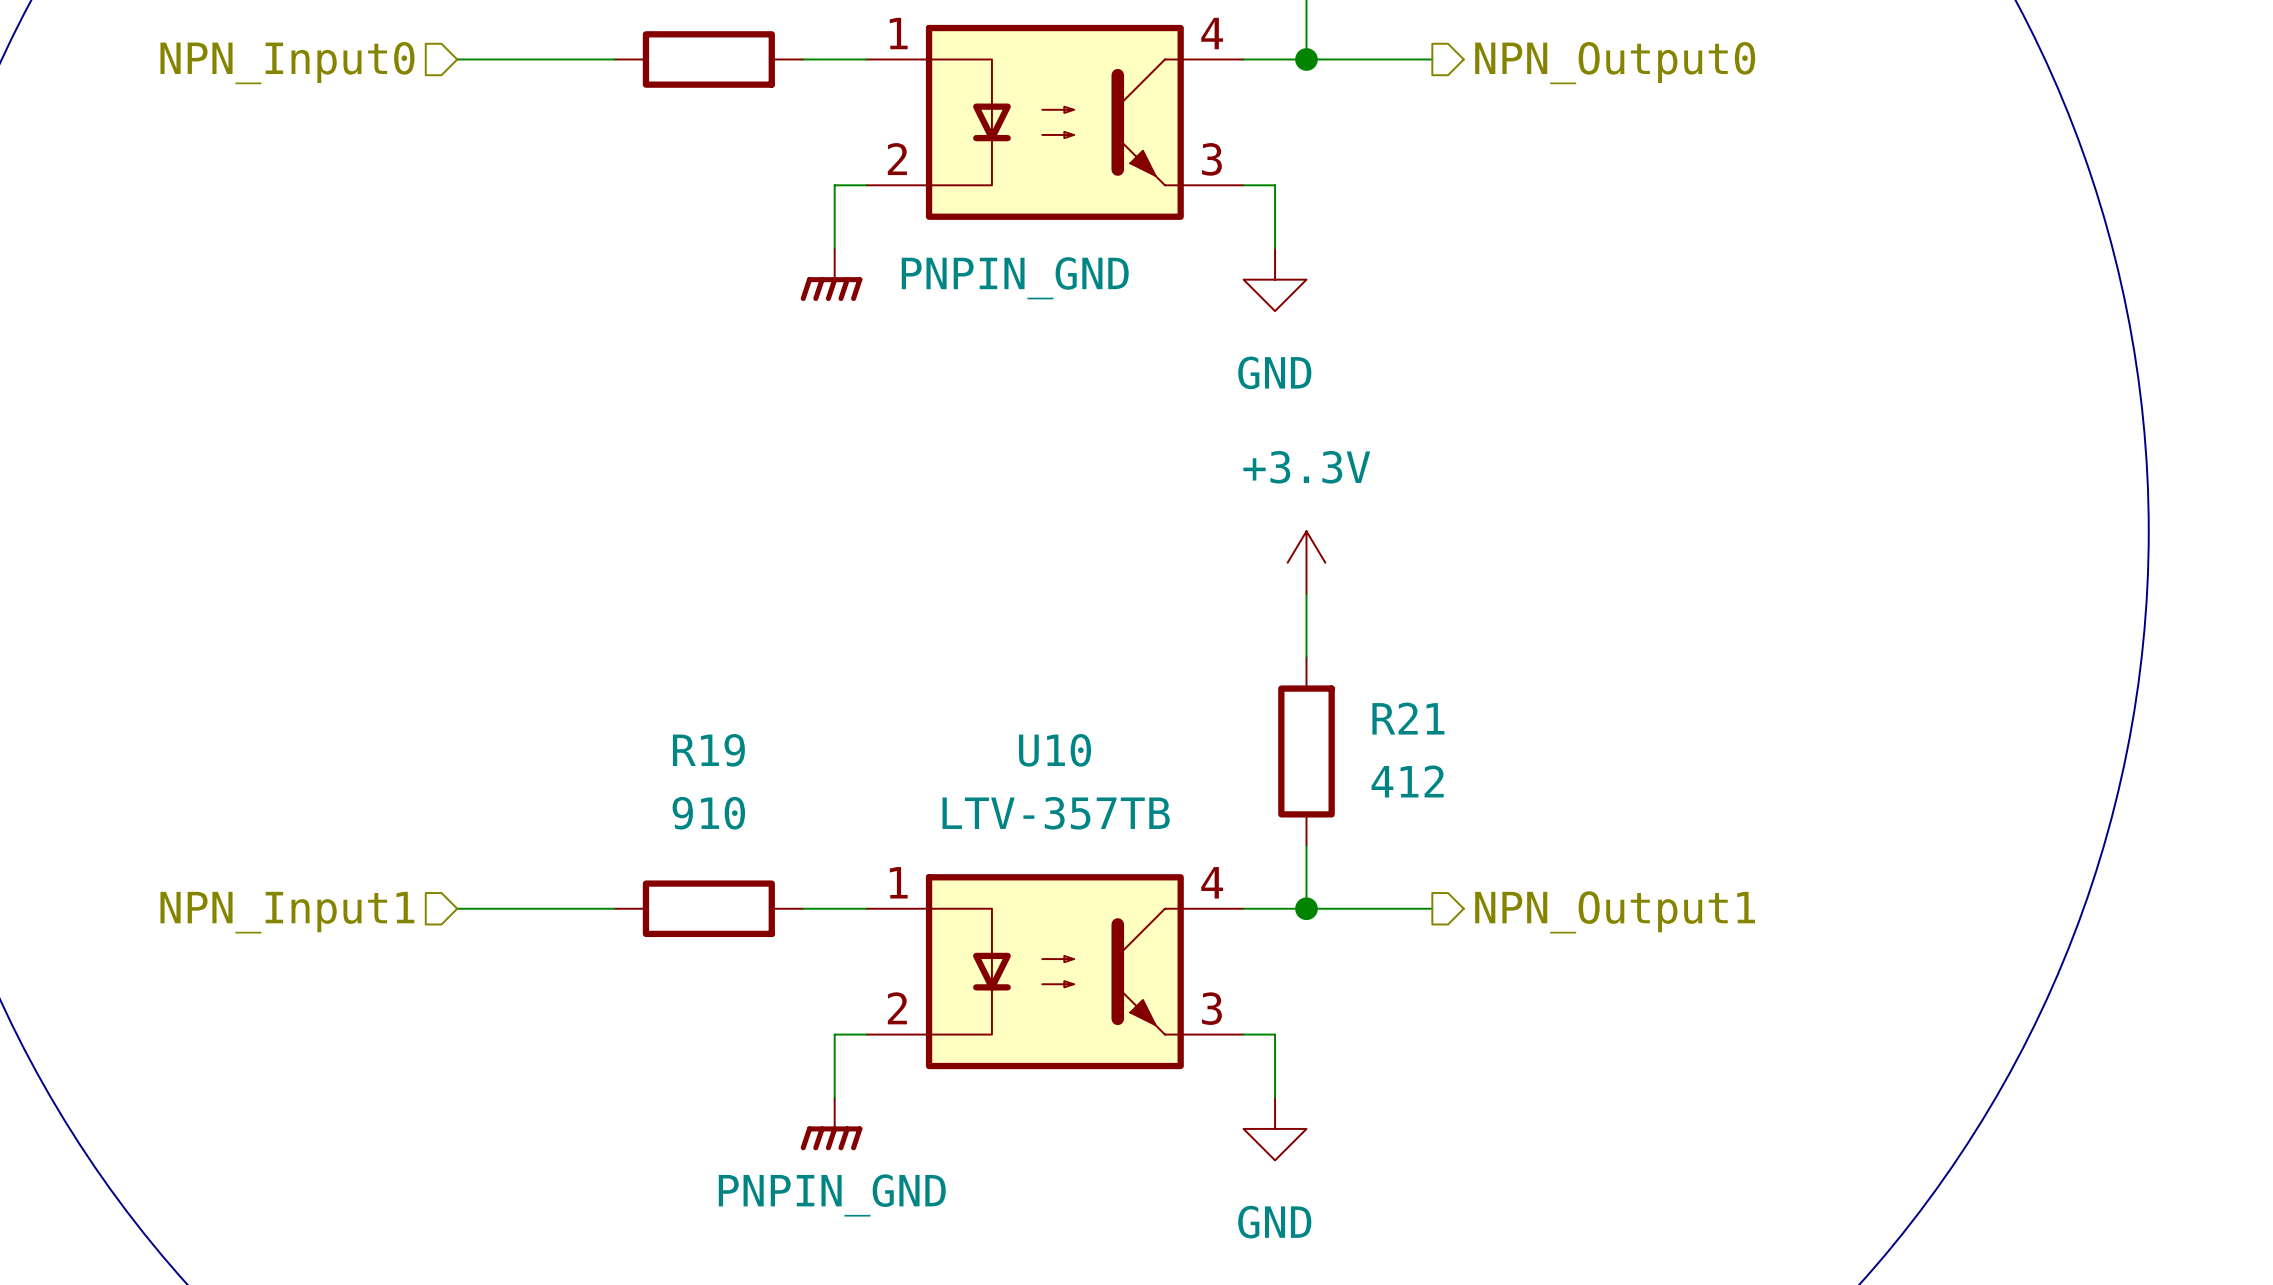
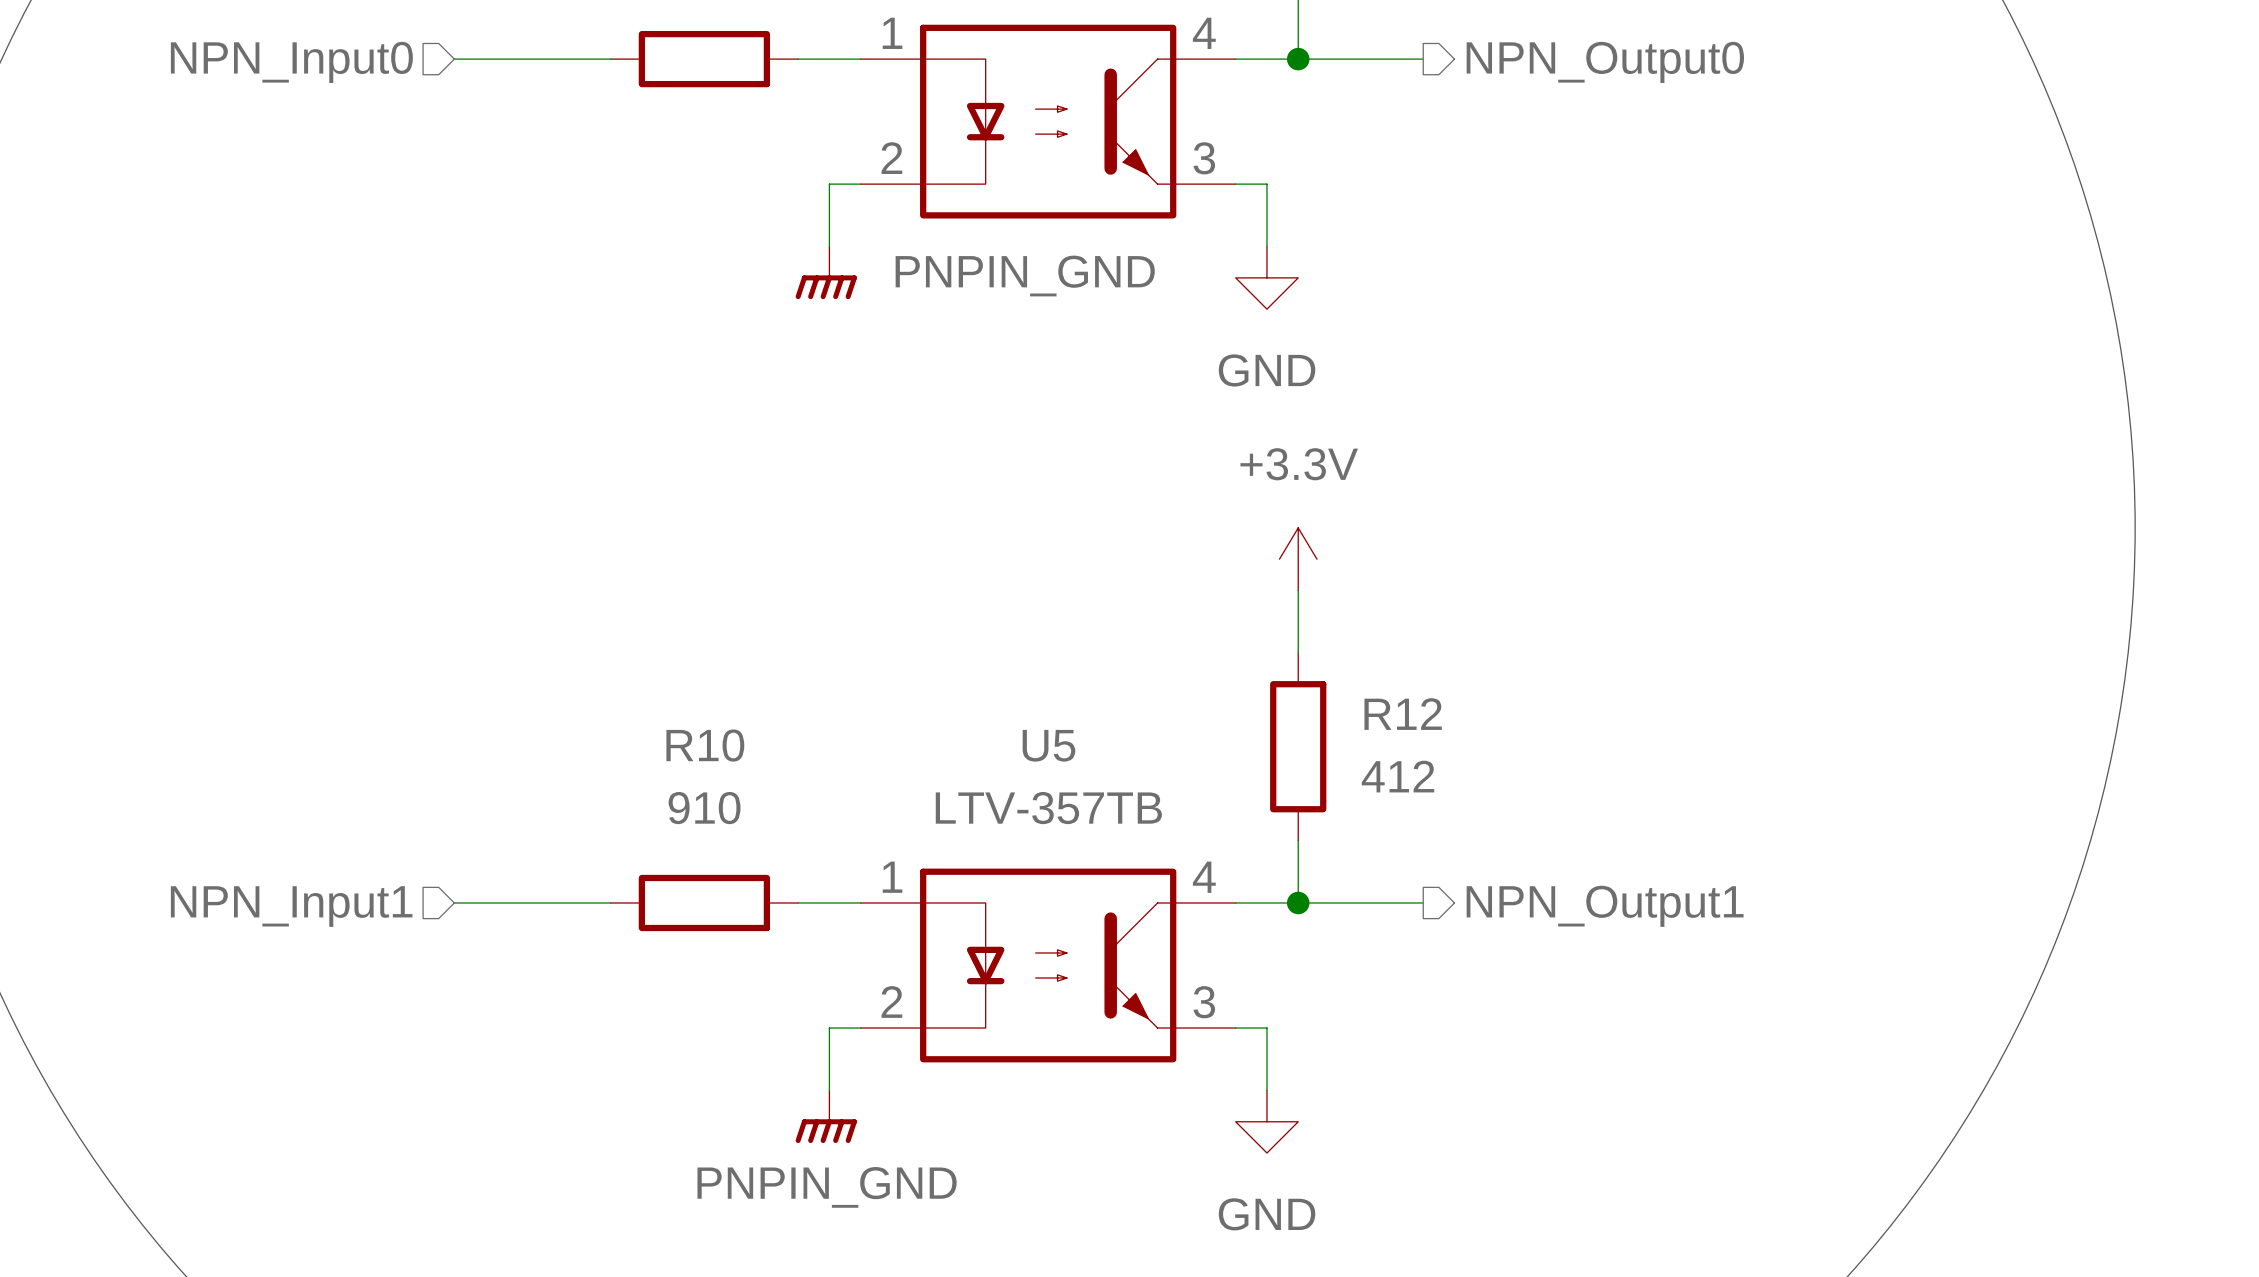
R21 name: R21 (1408, 718) -> R12 (1403, 714)
R19 name: R19 (708, 750) -> R10 (705, 745)
U10 name: U10 (1055, 750) -> U5 (1048, 745)

